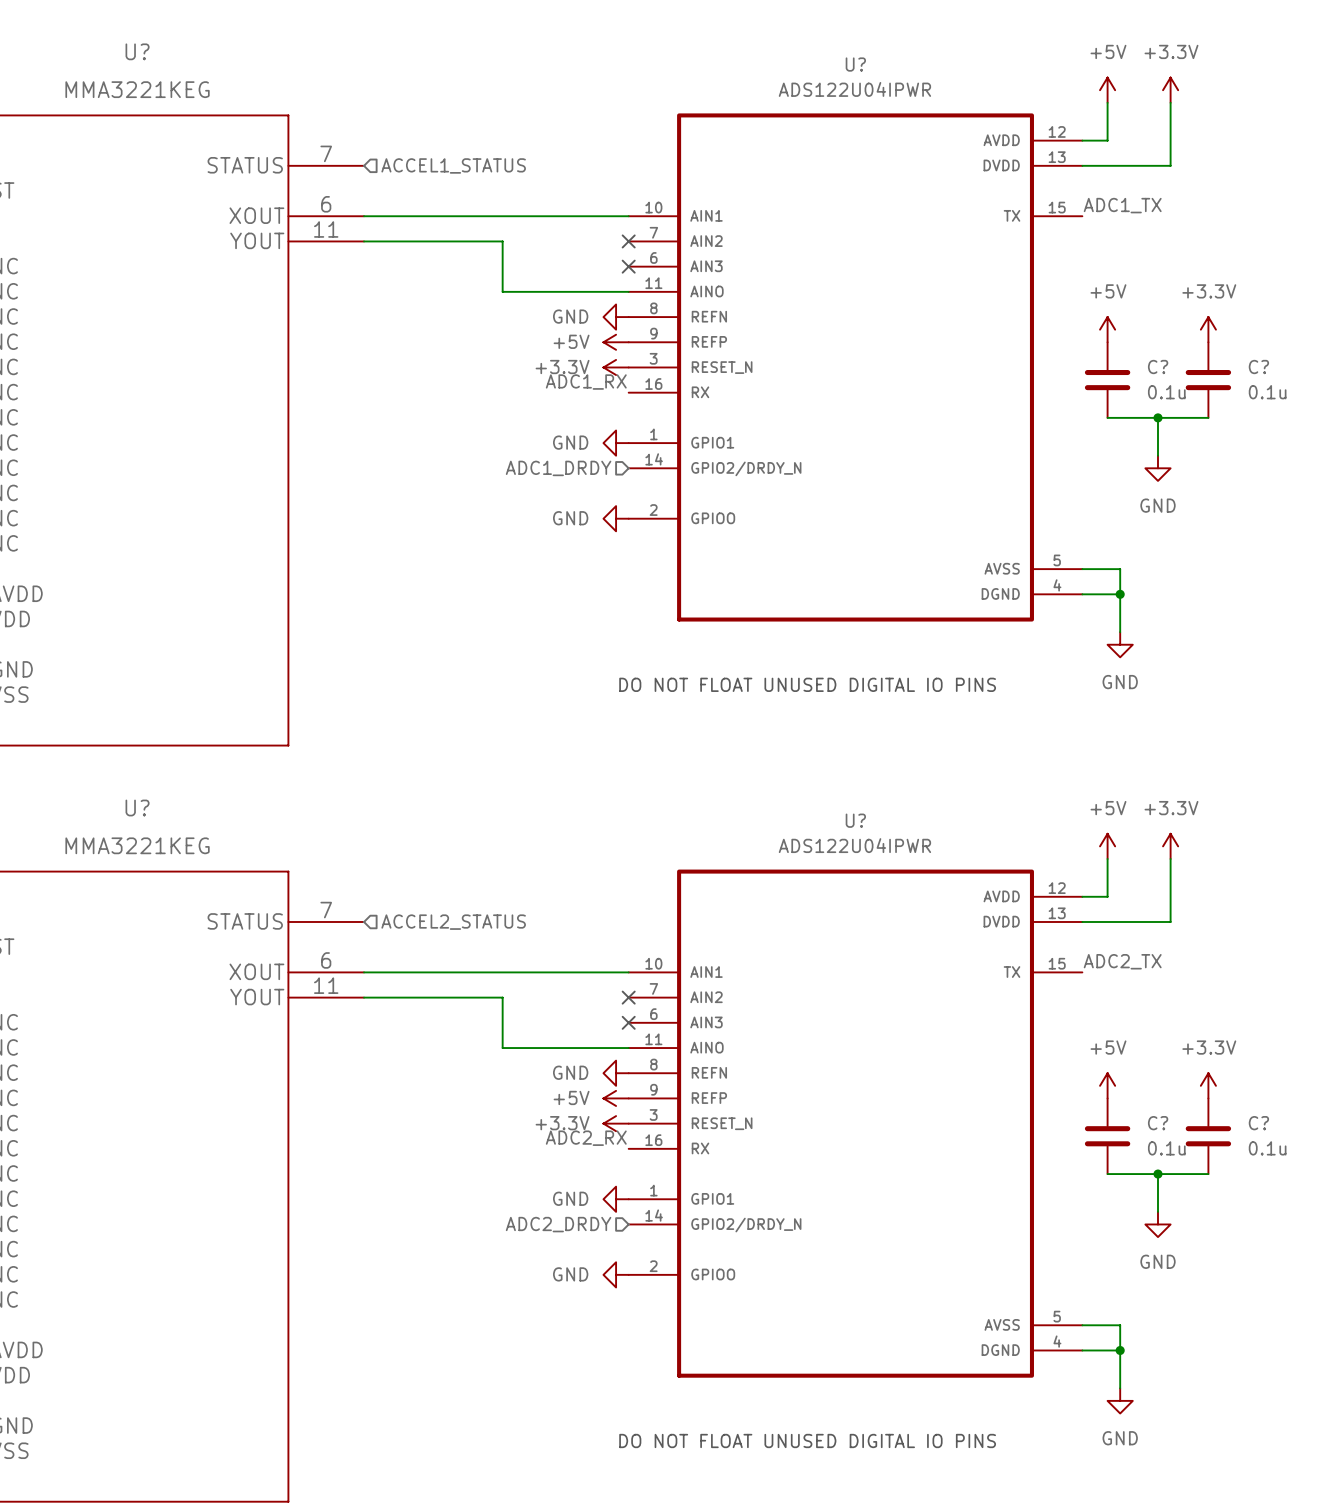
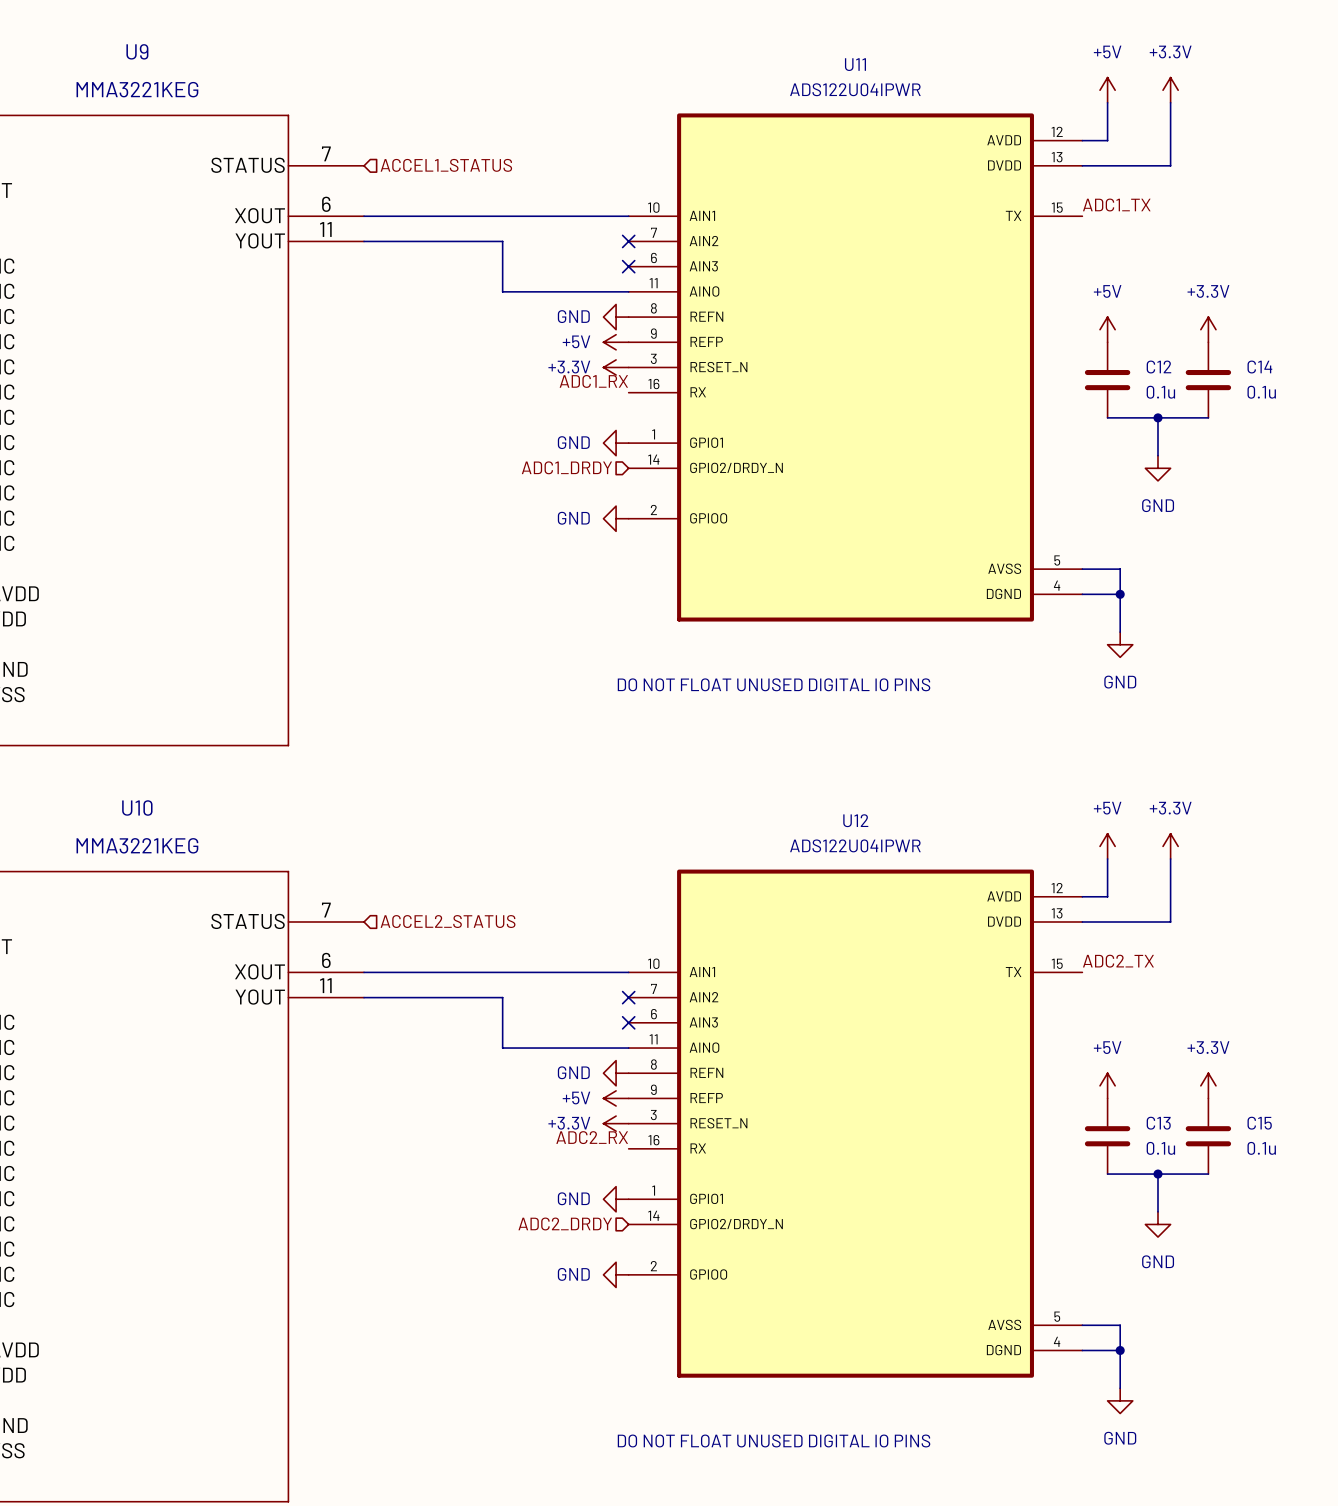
U? name: U? (137, 51) -> U9 (137, 51)
U? name: U? (855, 64) -> U11 (855, 64)
C? name: C? (1158, 367) -> C12 (1158, 367)
C? name: C? (1258, 367) -> C14 (1259, 367)
U? name: U? (137, 808) -> U10 (137, 808)
U? name: U? (855, 820) -> U12 (855, 820)
C? name: C? (1158, 1123) -> C13 (1158, 1123)
C? name: C? (1258, 1123) -> C15 (1259, 1123)

